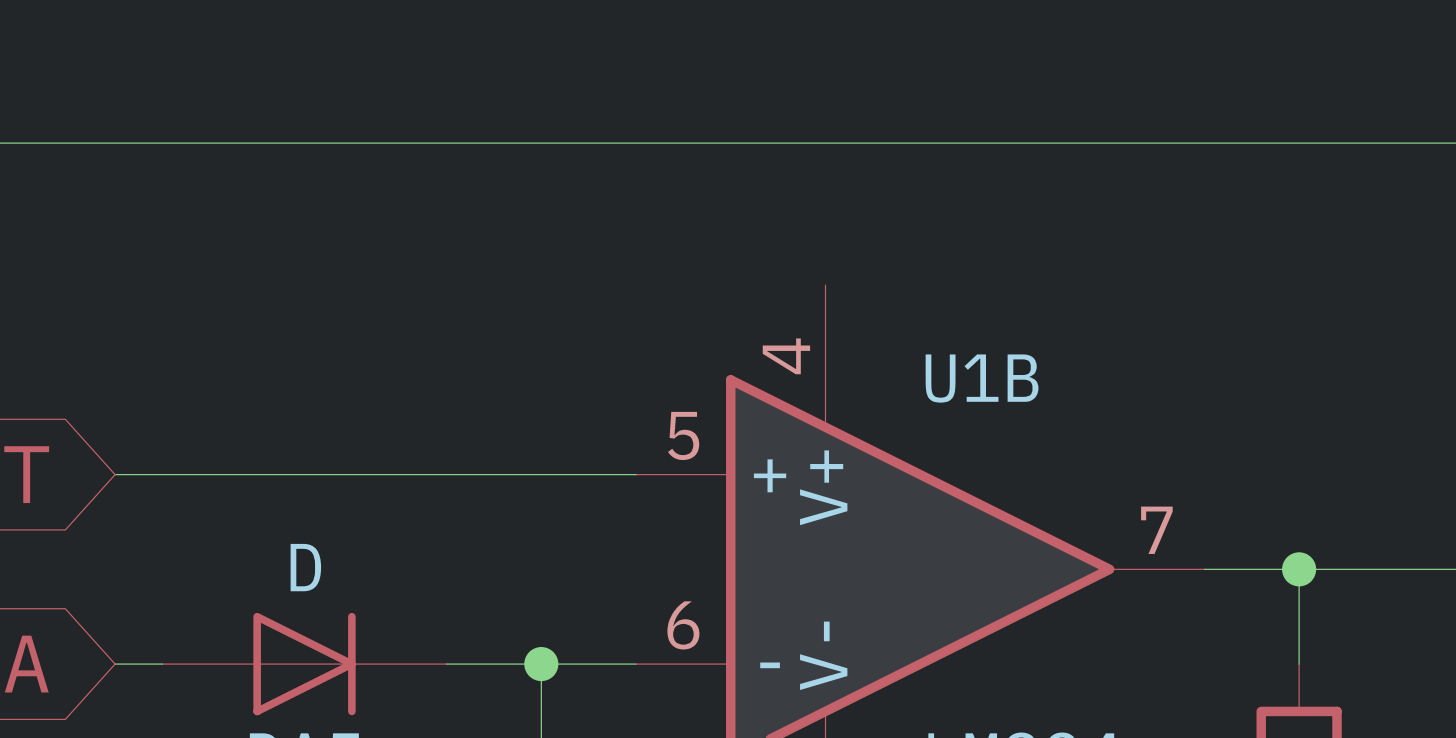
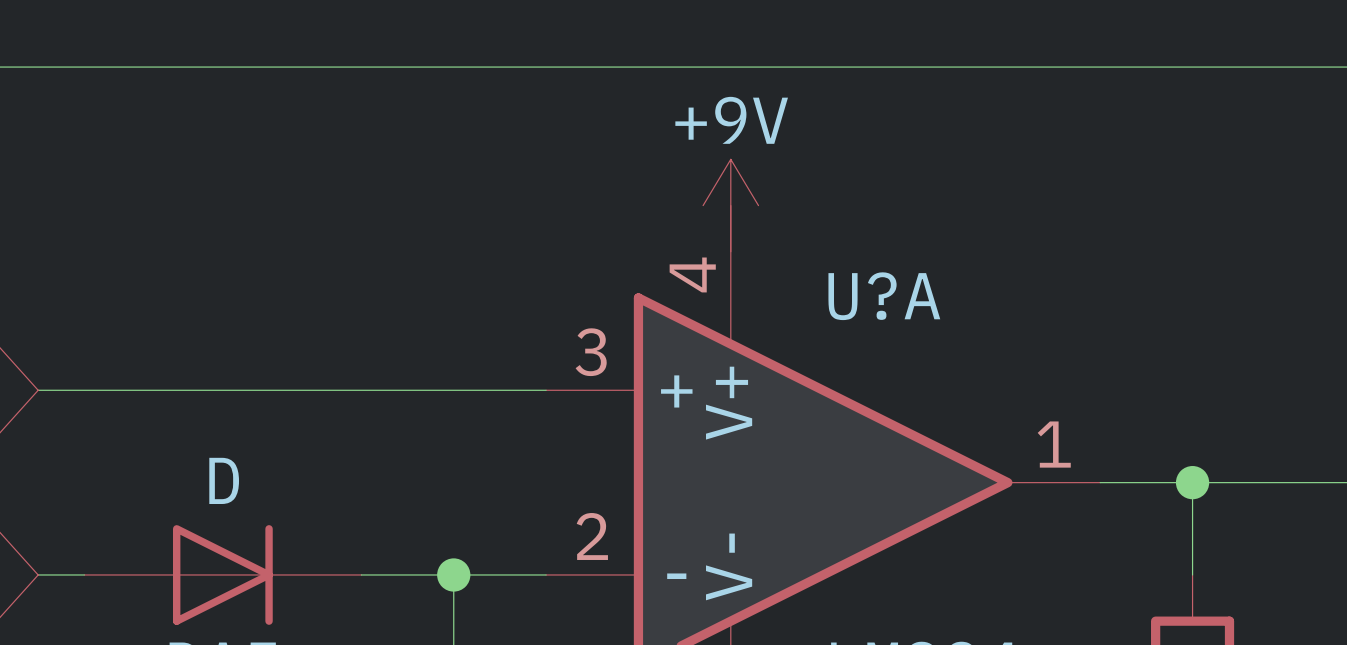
power symbol: none -> +9V (730, 205)
U1B name: U1B (982, 378) -> U?A (884, 296)
U1B pin number: 5 (683, 435) -> 3 (591, 352)
U1B pin number: 7 (1156, 530) -> 1 (1054, 444)
U1B pin number: 6 (683, 625) -> 2 (592, 536)

